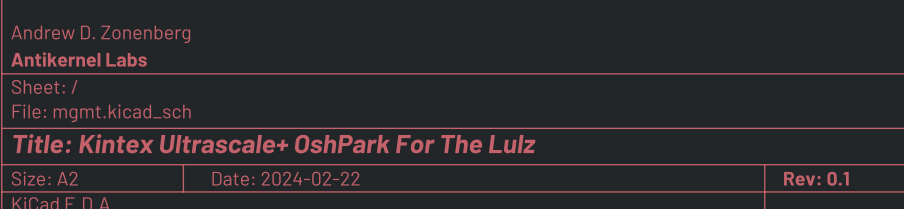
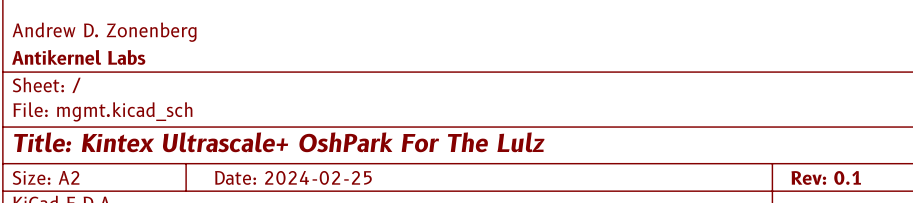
title block: Date: 2024-02-22 (286, 178) -> Date: 2024-02-25 (293, 177)

